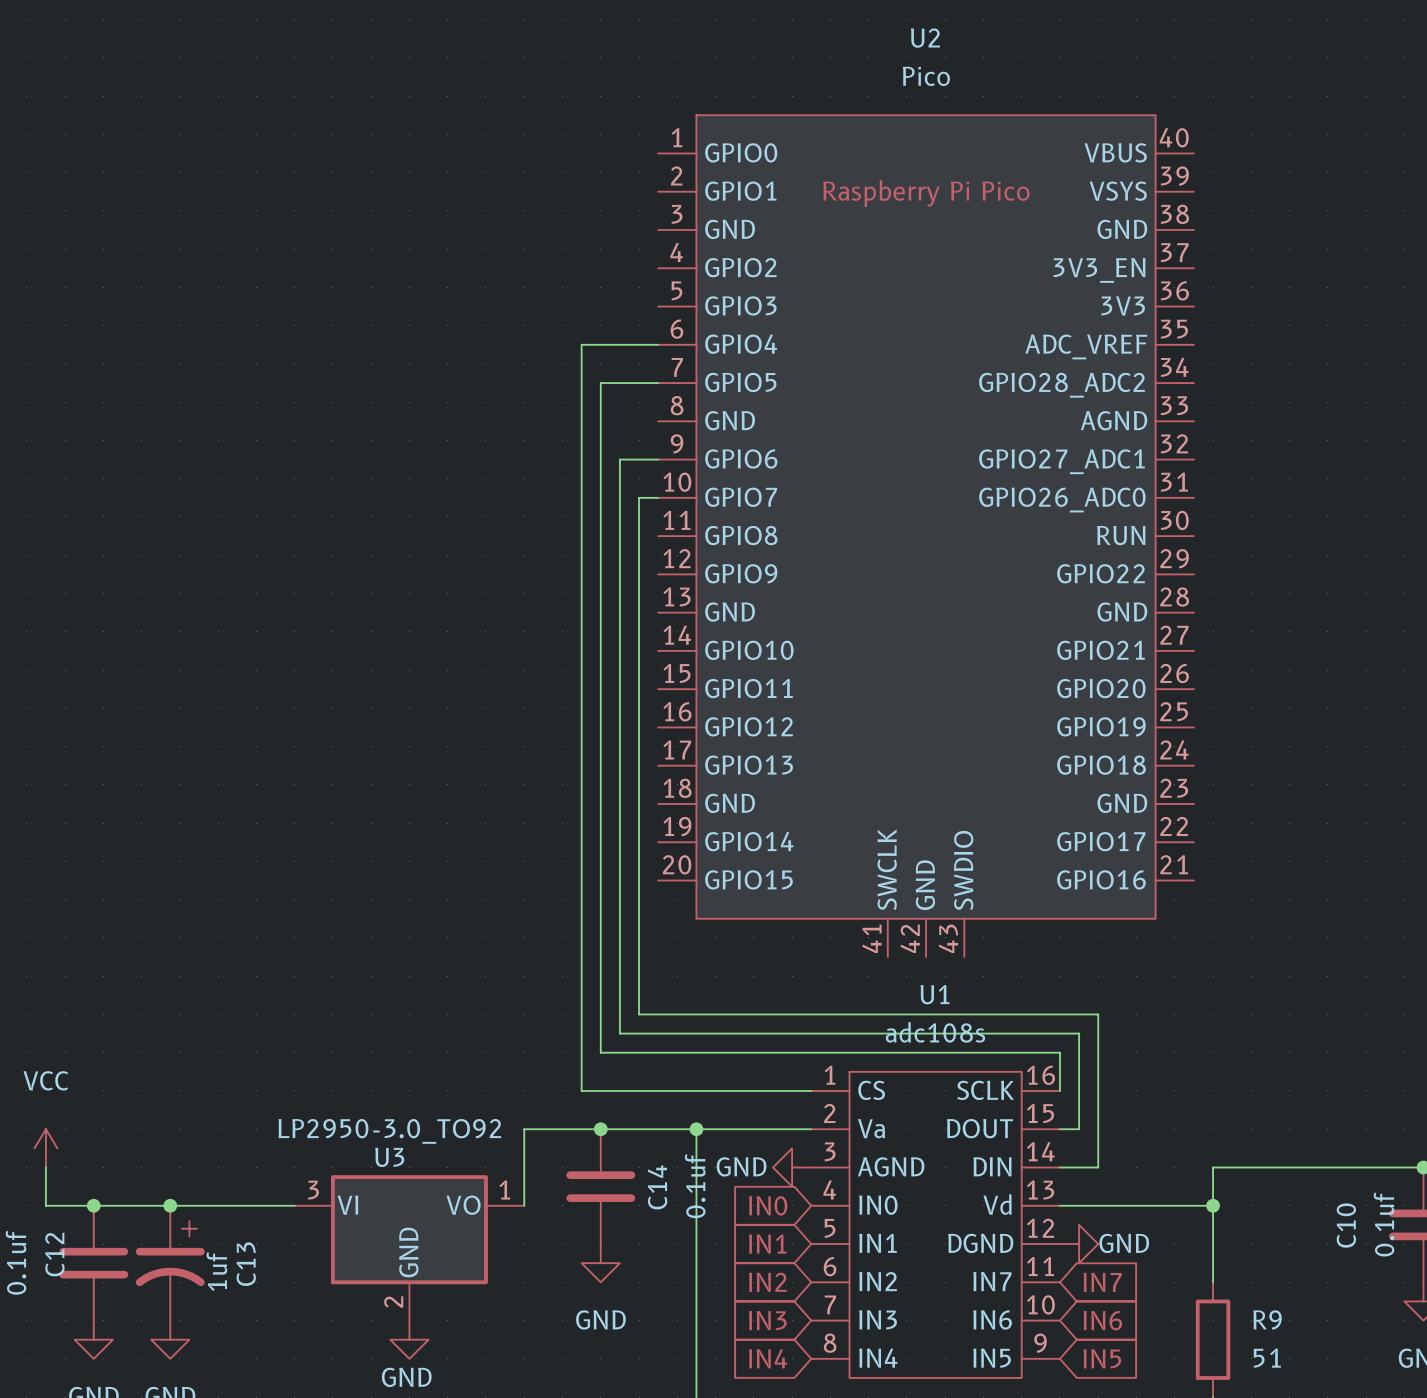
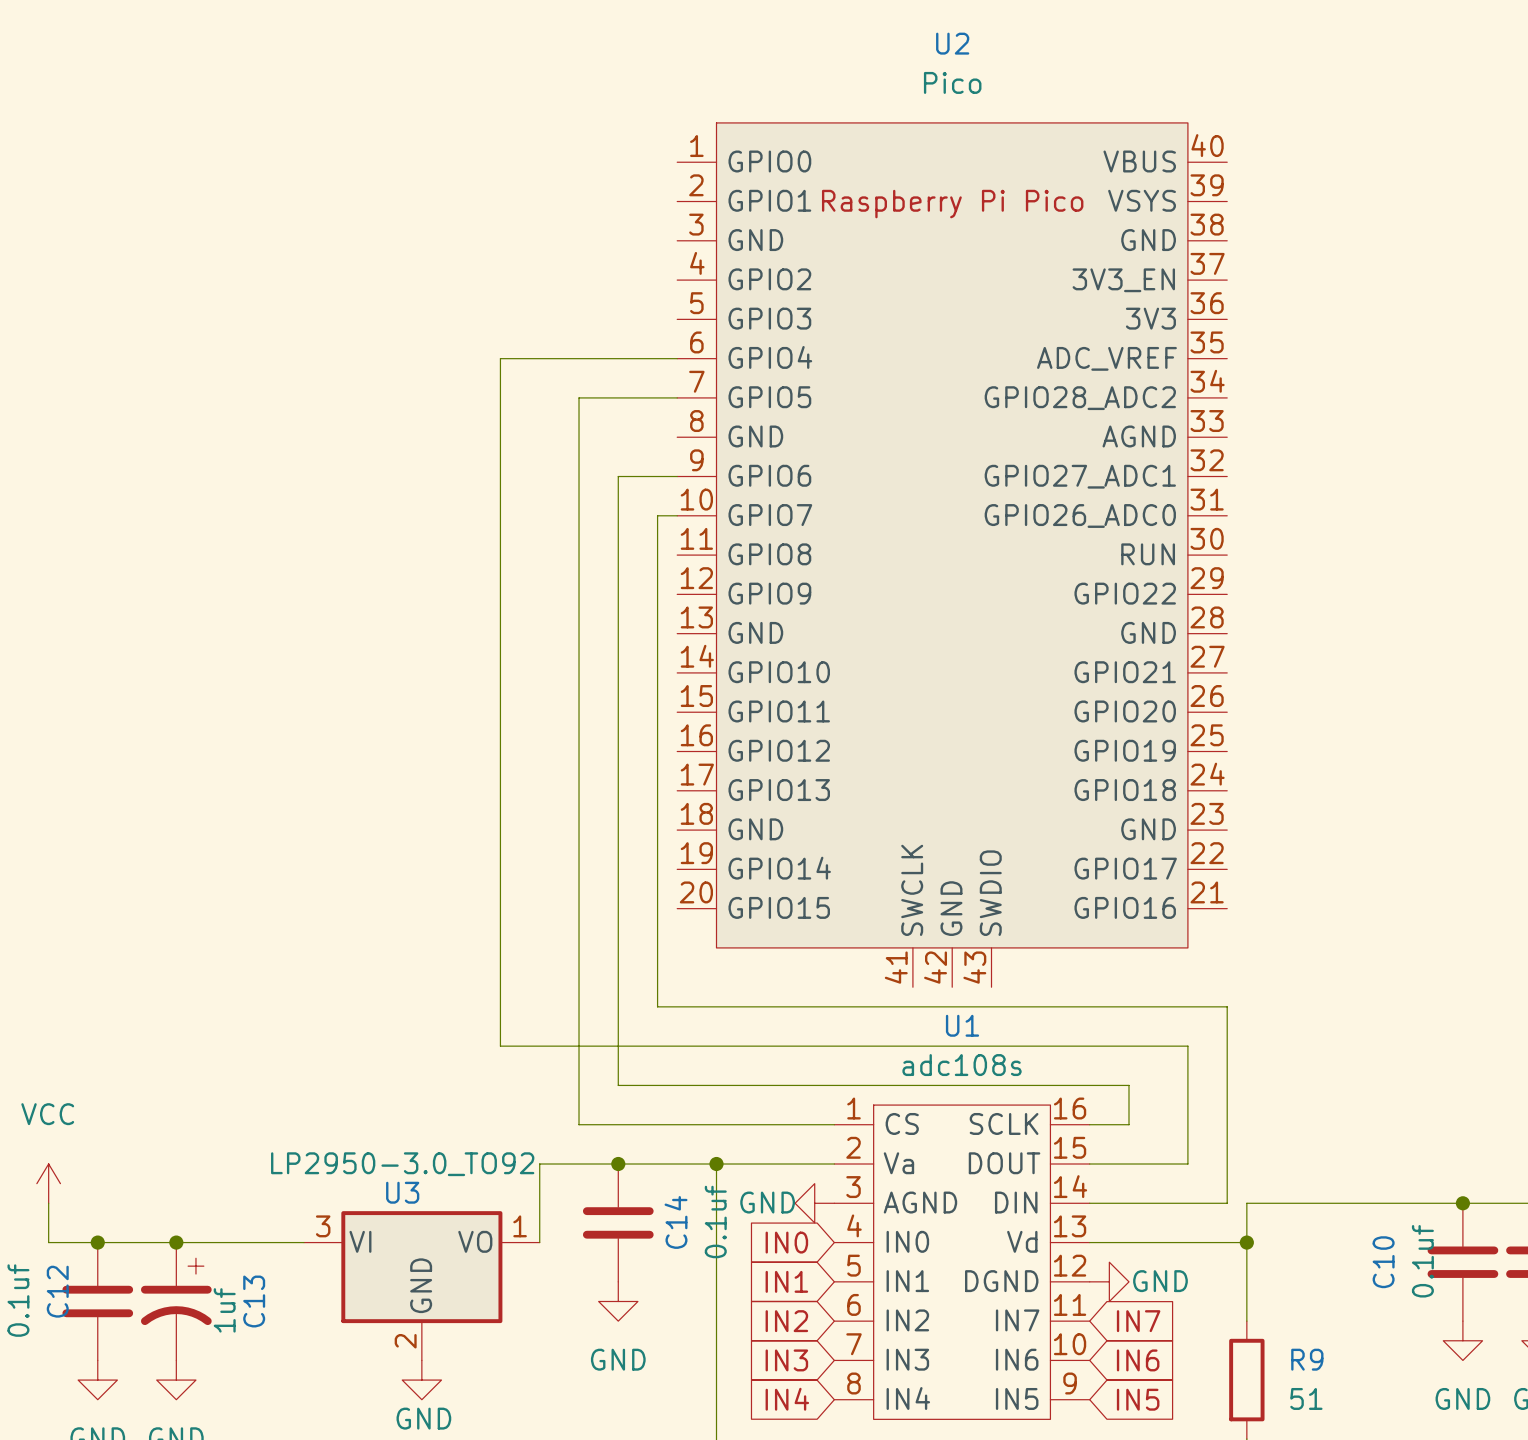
wire: (581, 344) (581, 1090) -> (618, 397) (579, 397) (579, 1124) (598, 1124)
wire: none -> (598, 358) (500, 358) (500, 1046) (657, 1046)
wire: (600, 383) (600, 459) -> (637, 476) (618, 476)
wire: (619, 459) (619, 1033) (1079, 1033) (1079, 1129) -> none
wire: (639, 976) (639, 1014) -> (657, 1006) (1227, 1006) (1227, 1203) (1128, 1203)
wire: (1098, 1014) (1098, 1052) -> (1128, 1046) (1187, 1046) (1187, 1164) (1109, 1164)
wire: (1059, 1052) (1059, 1090) -> (1089, 1085) (1128, 1085)
wire: (1098, 1090) (1098, 1167) -> (1128, 1124) (1089, 1124)

